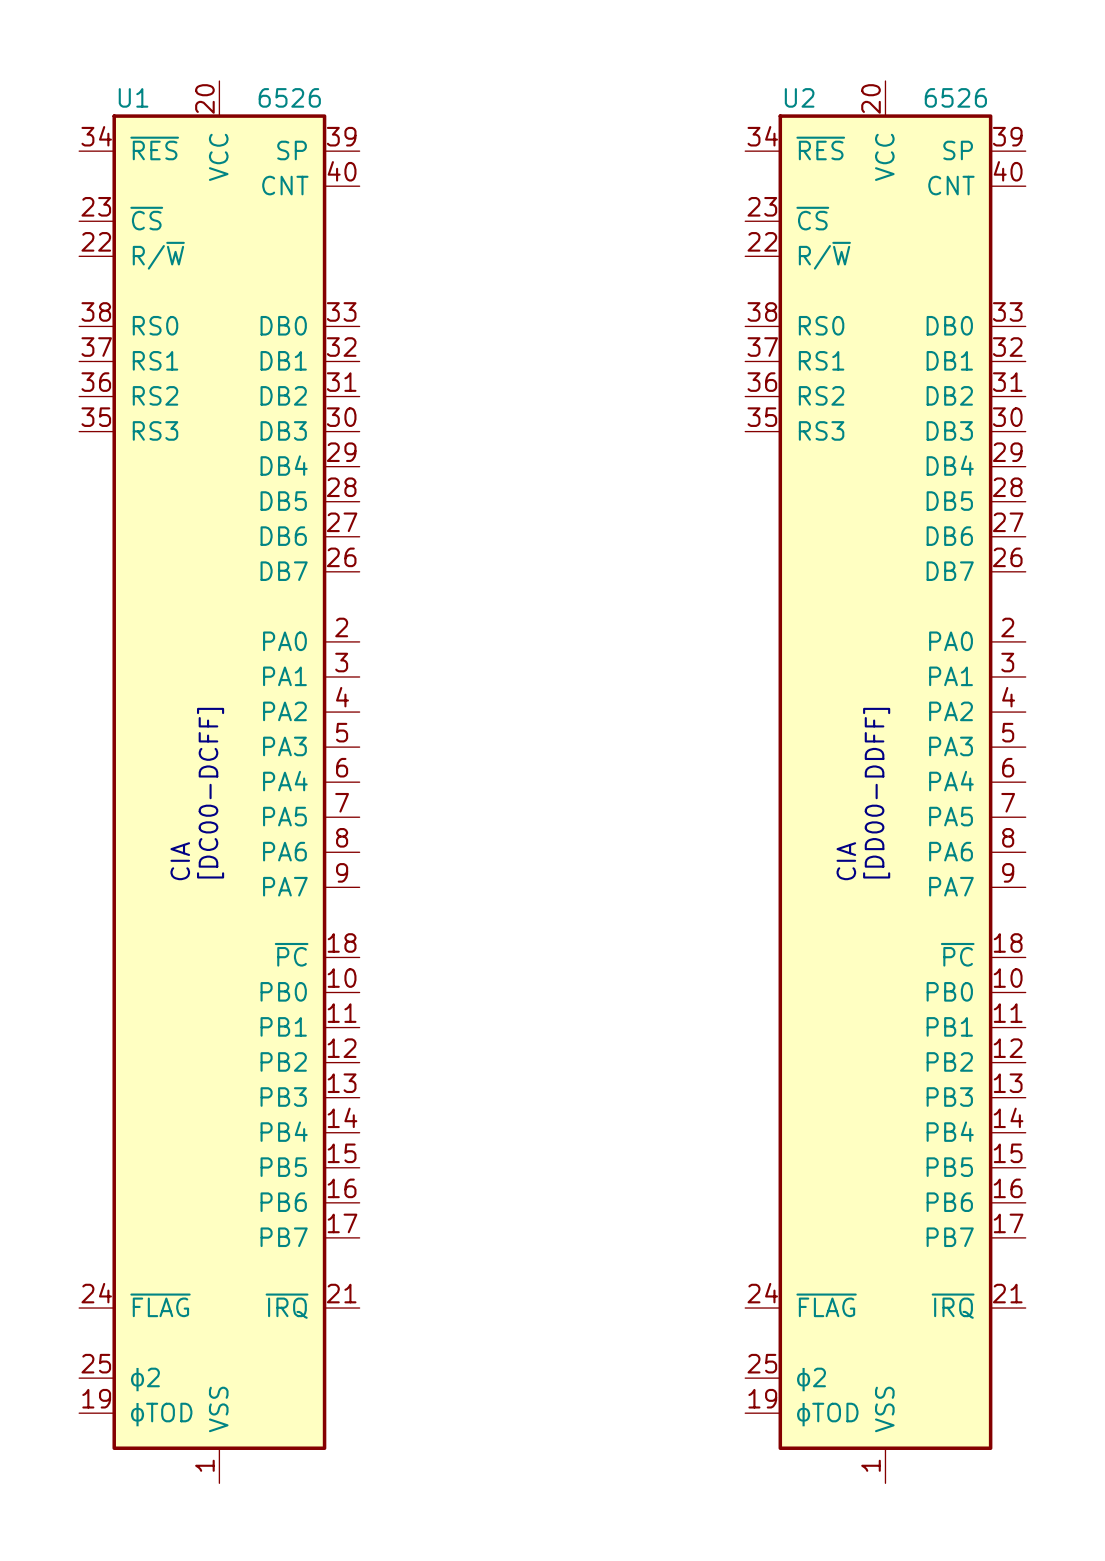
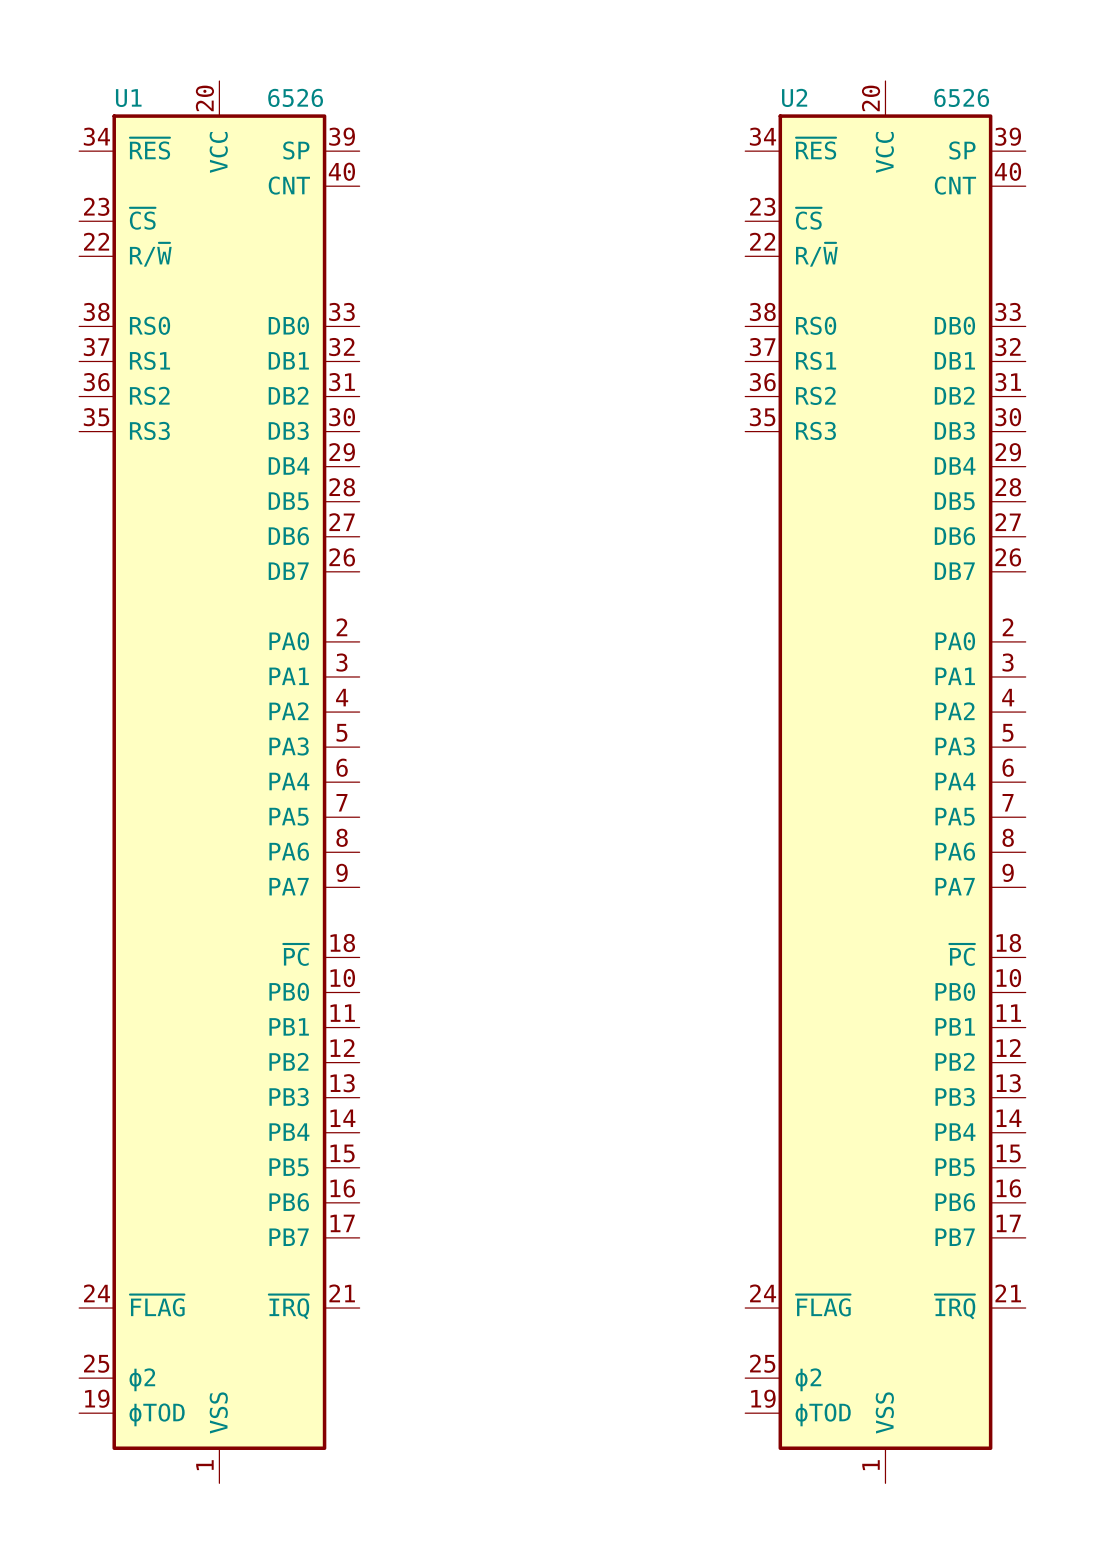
text: [DC00-DCFF] (210, 793) -> none
text: [DD00-DDFF] (876, 793) -> none
text: CIA (180, 861) -> none
text: CIA (846, 861) -> none

